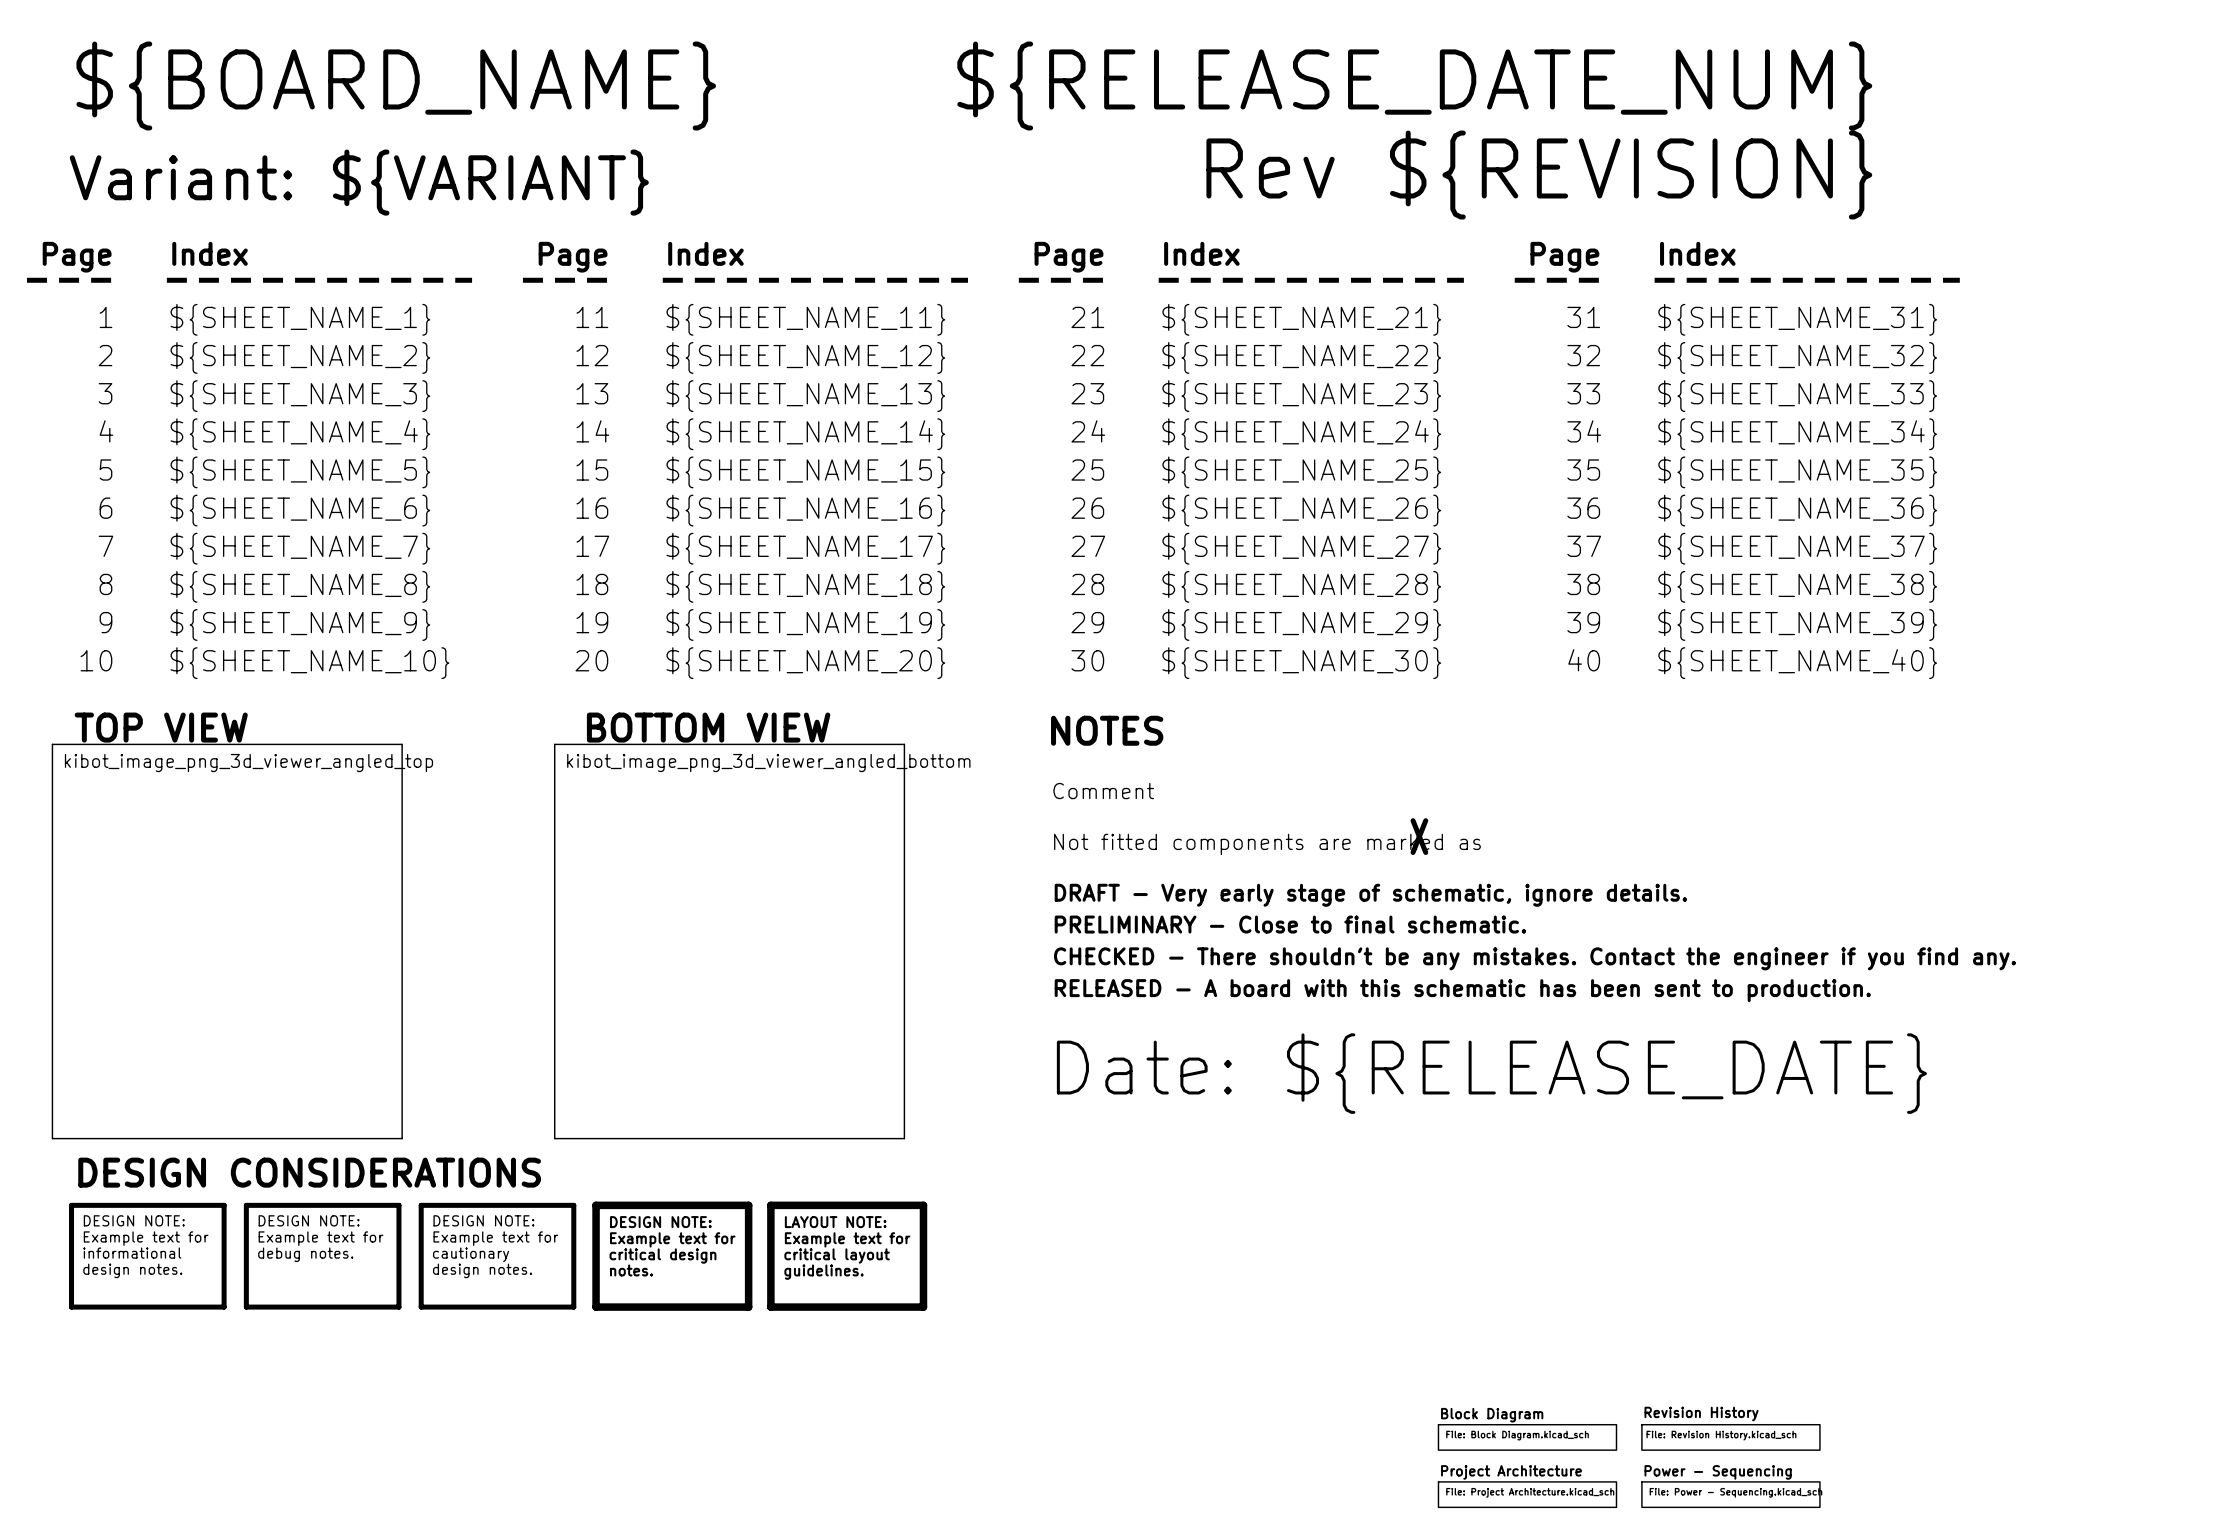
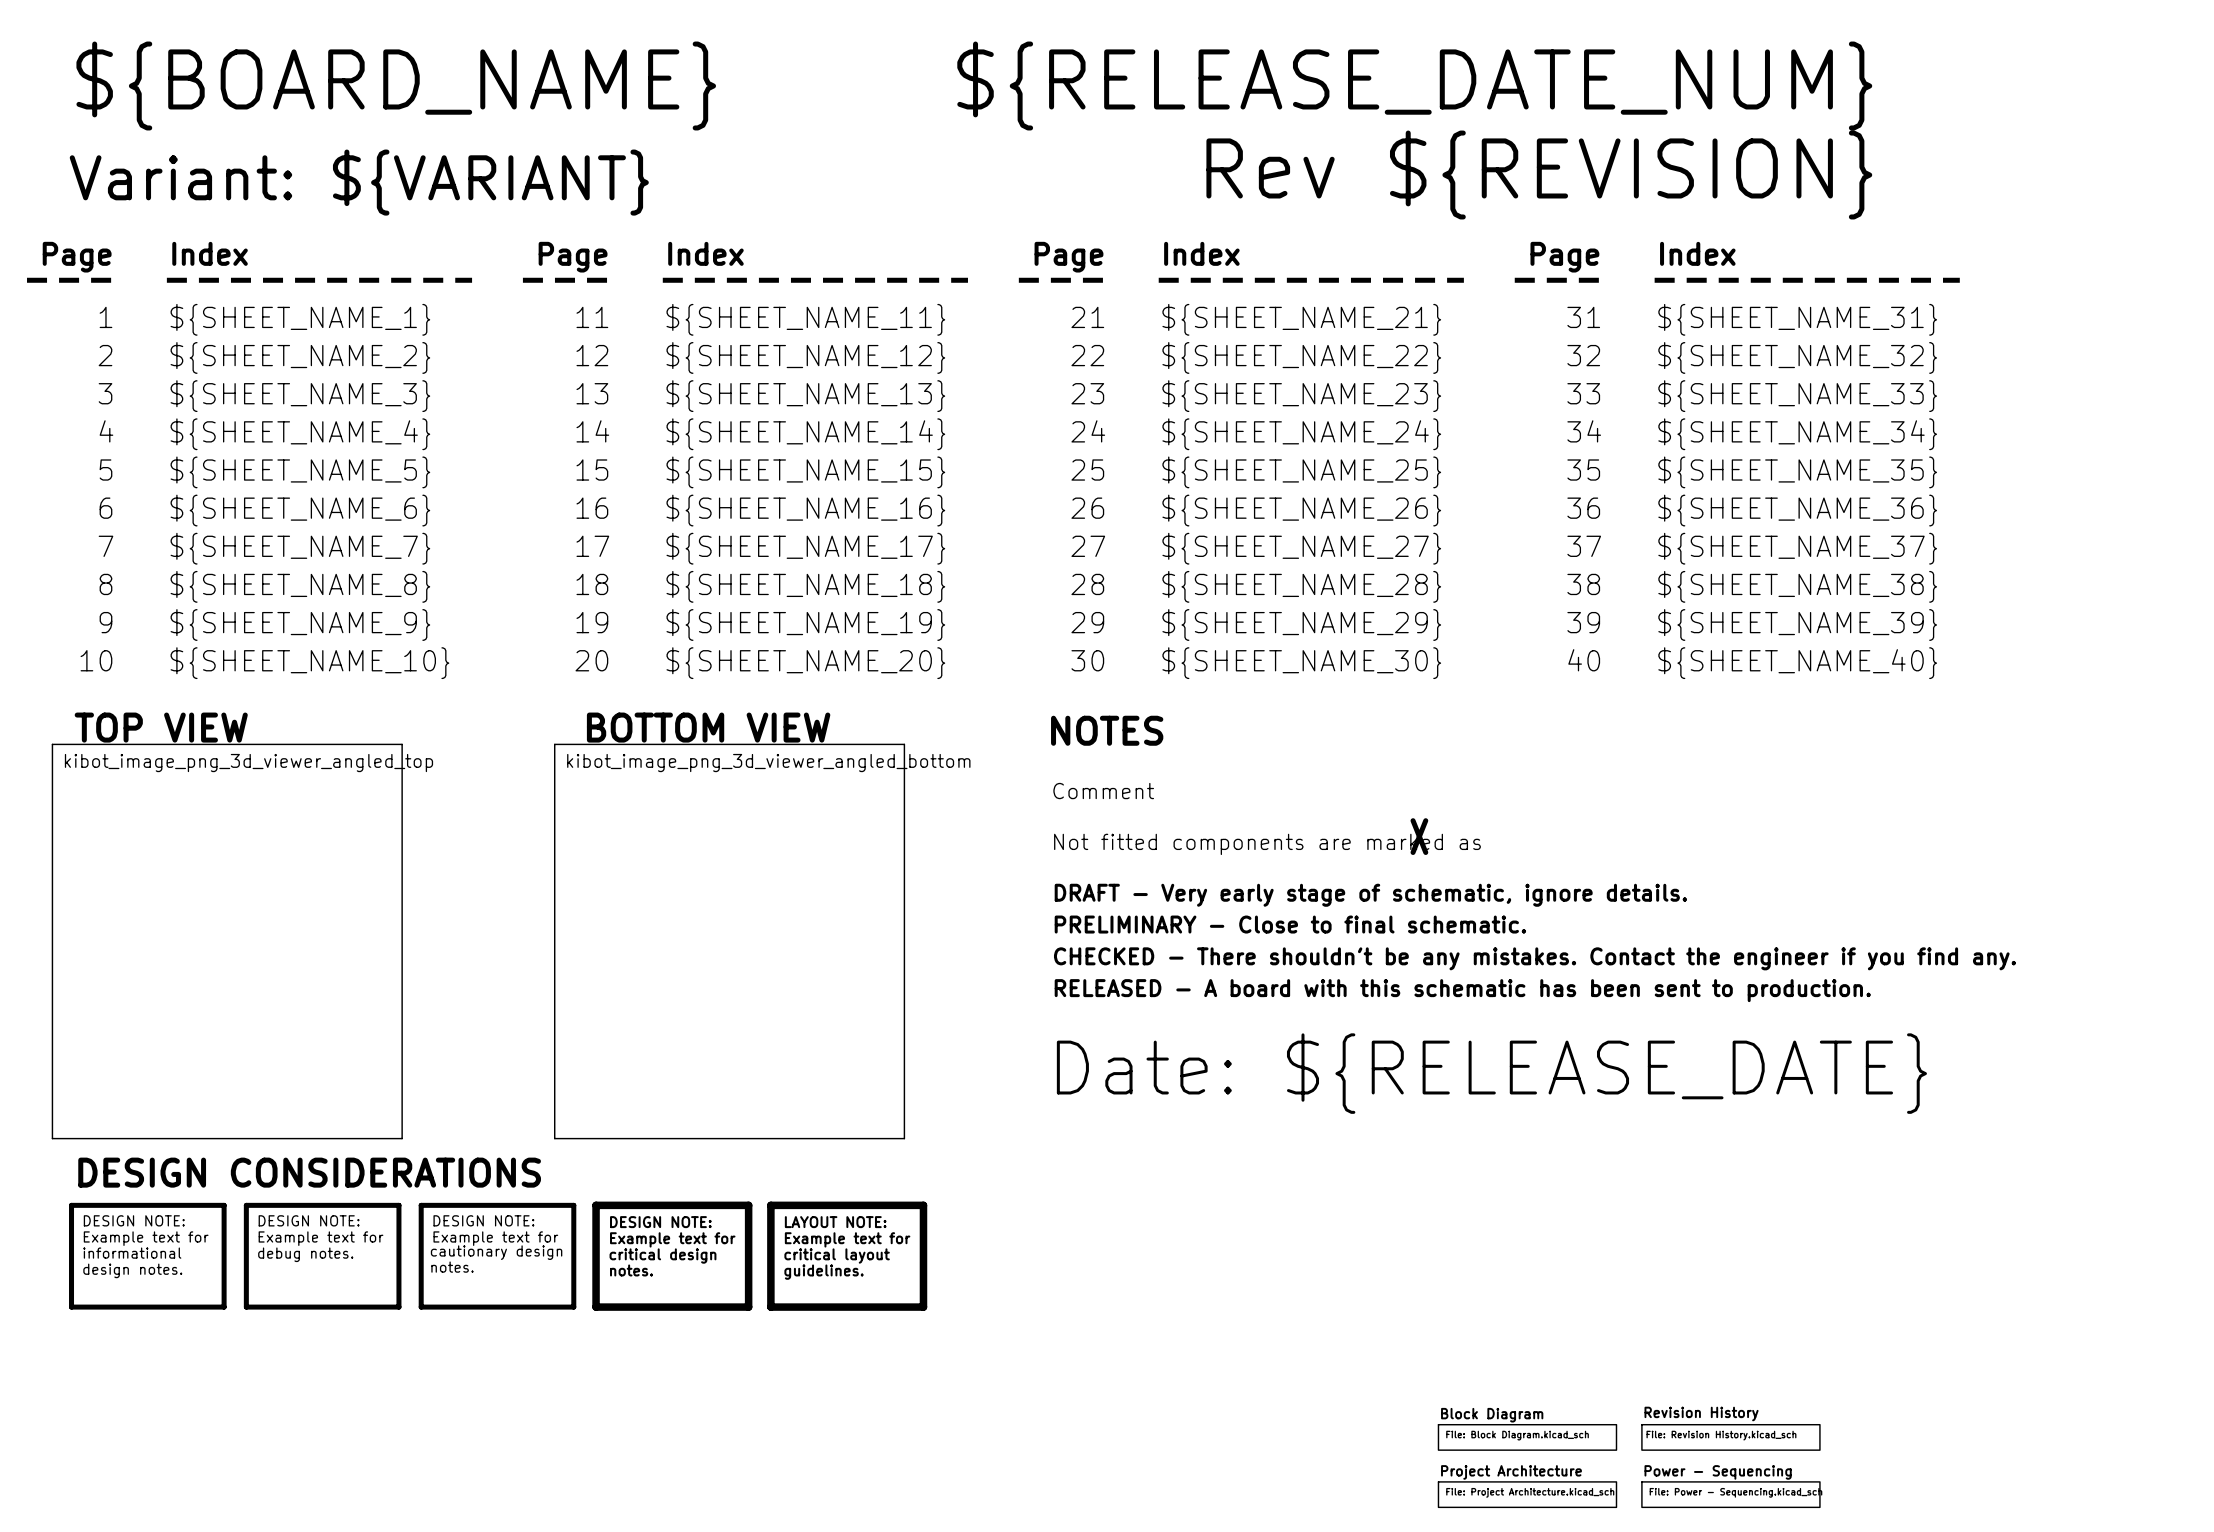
text: cautionary (471, 1254) -> cautionary design (496, 1252)
text: design notes. (482, 1270) -> notes. (452, 1267)

